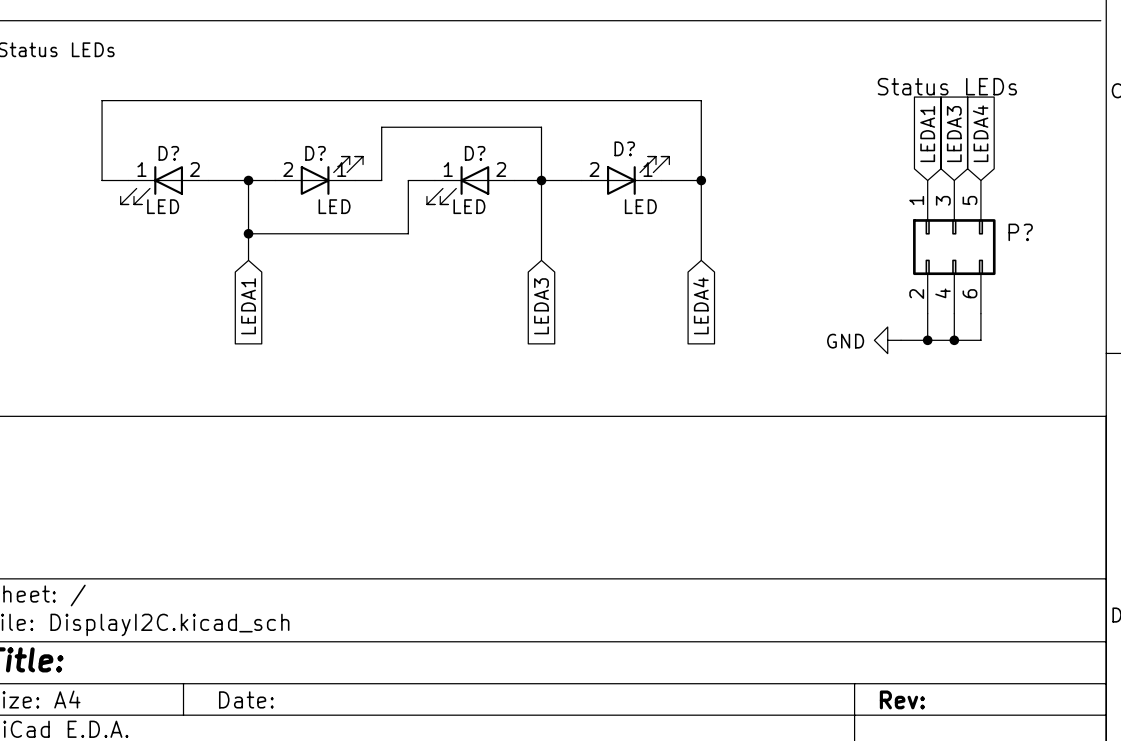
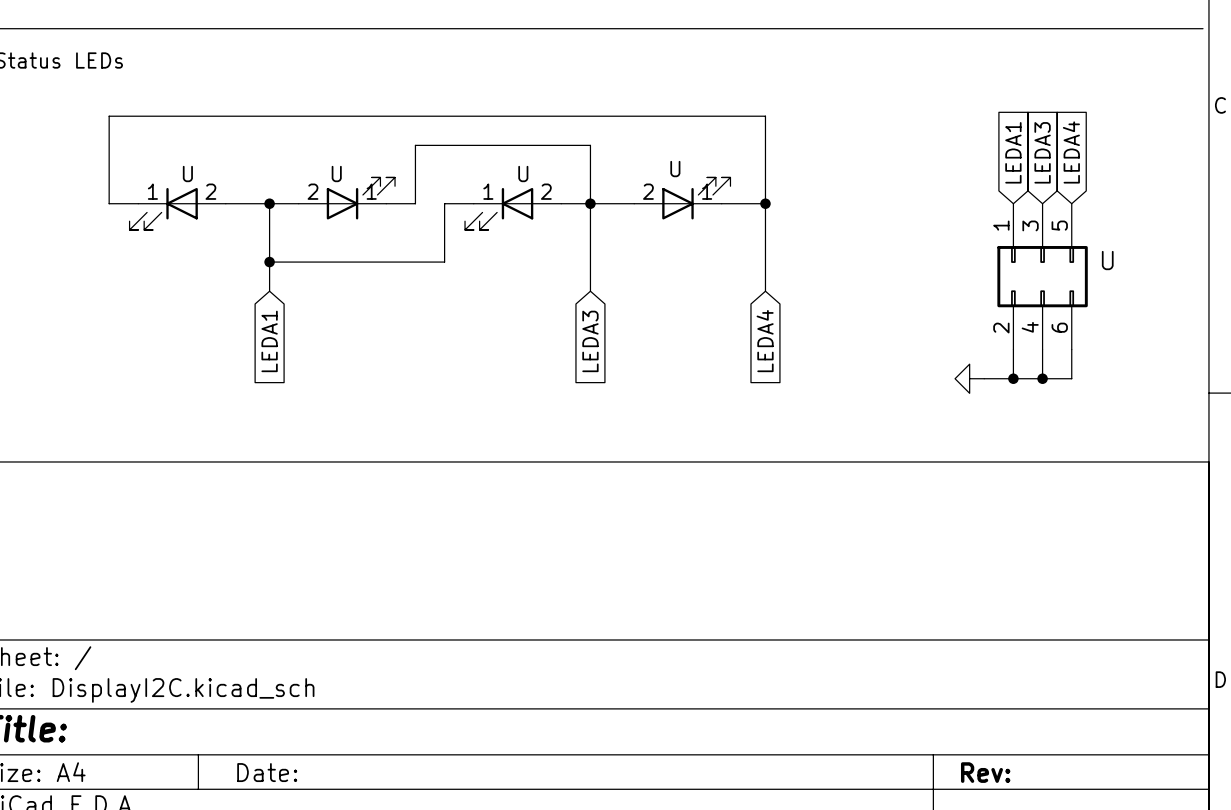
P? value: Status LEDs (947, 86) -> none
D? name: D? (624, 148) -> U (675, 169)
D? name: D? (168, 153) -> U (187, 174)
D? name: D? (315, 153) -> U (336, 174)
D? name: D? (475, 153) -> U (523, 174)
D? value: LED (163, 206) -> none
D? value: LED (334, 206) -> none
D? value: LED (469, 206) -> none
D? value: LED (640, 206) -> none
P? name: P? (1020, 232) -> U (1107, 260)
power symbol text: GND (845, 341) -> none

